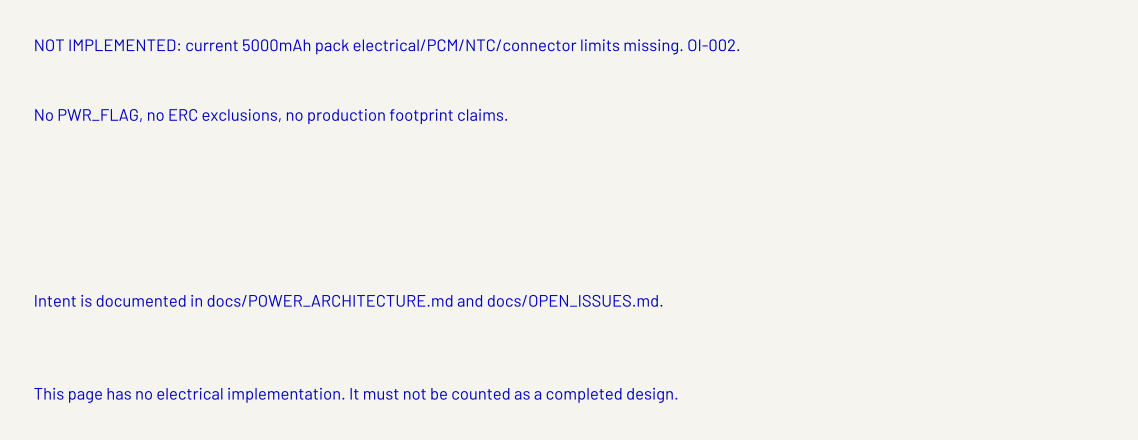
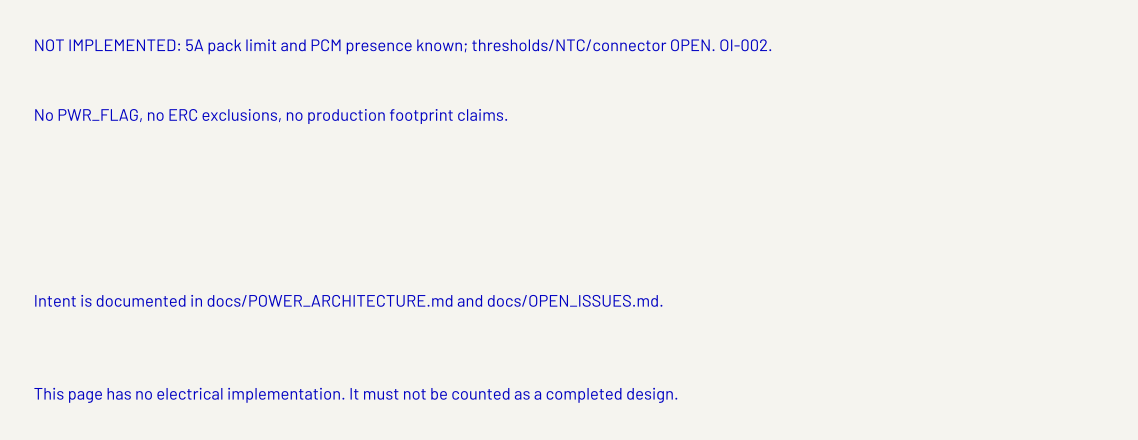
text: NOT IMPLEMENTED: current 5000mAh pack electrical/PCM/NTC/connector limits missing. OI-002. (387, 46) -> NOT IMPLEMENTED: 5A pack limit and PCM presence known; thresholds/NTC/connector OPEN. OI-002. (403, 46)

